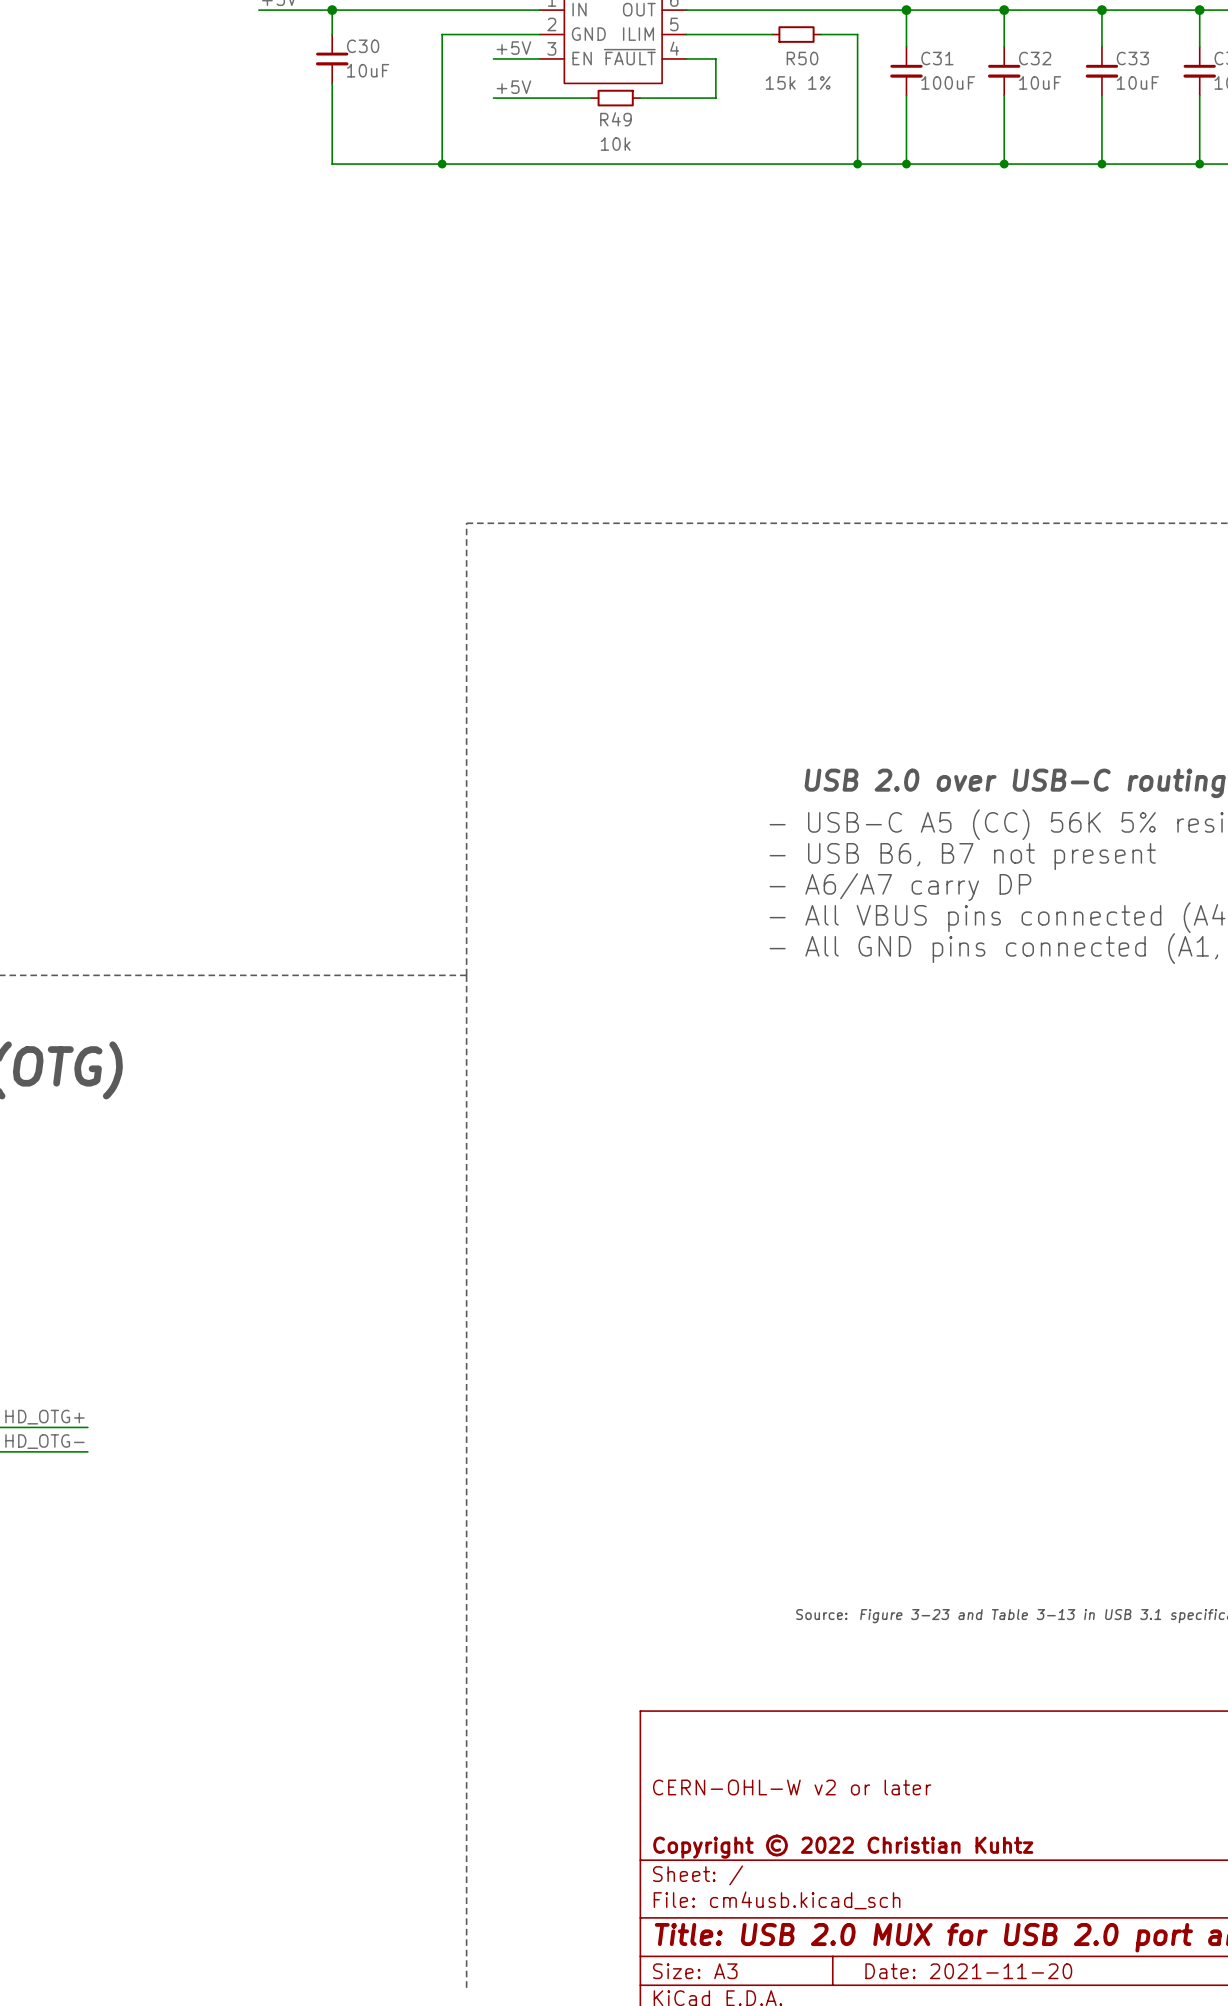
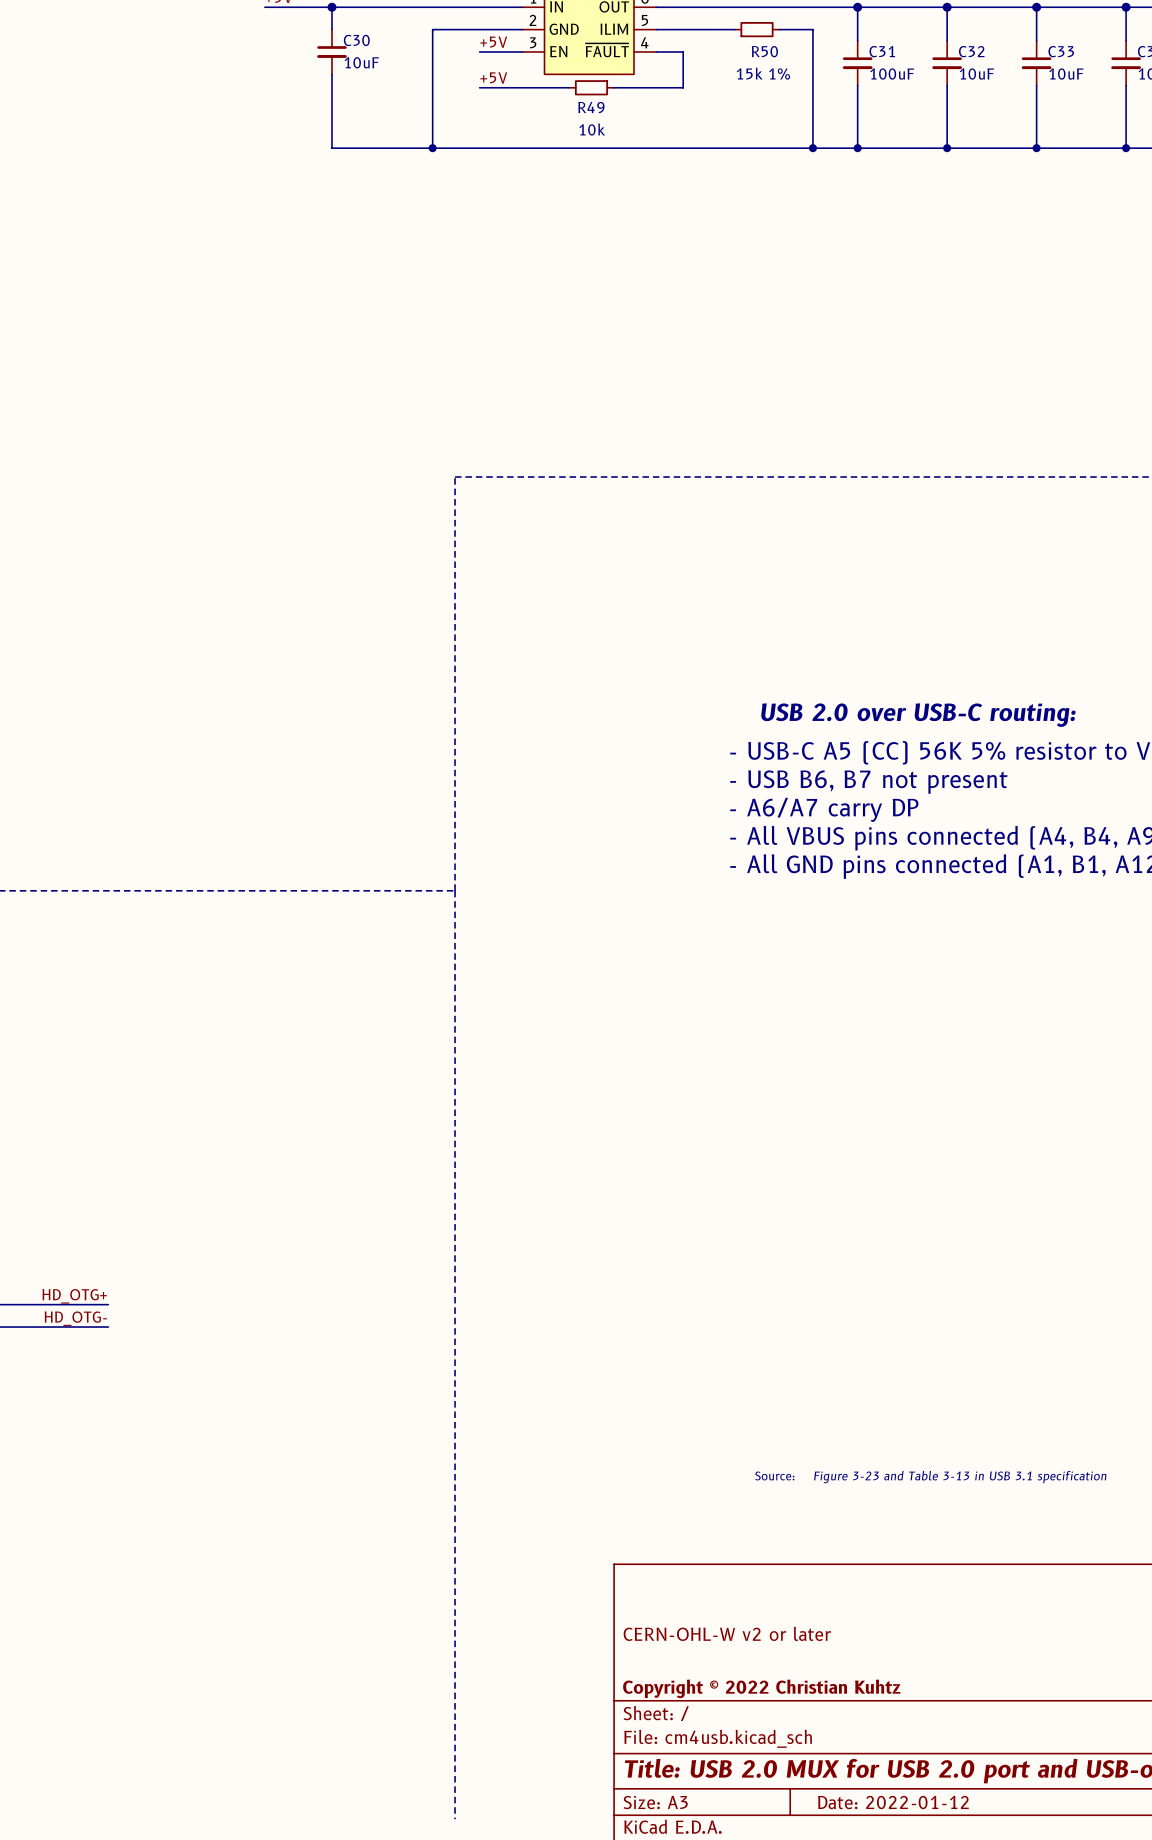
title block: Date: 2021-11-20 (968, 1971) -> Date: 2022-01-12 (893, 1802)

